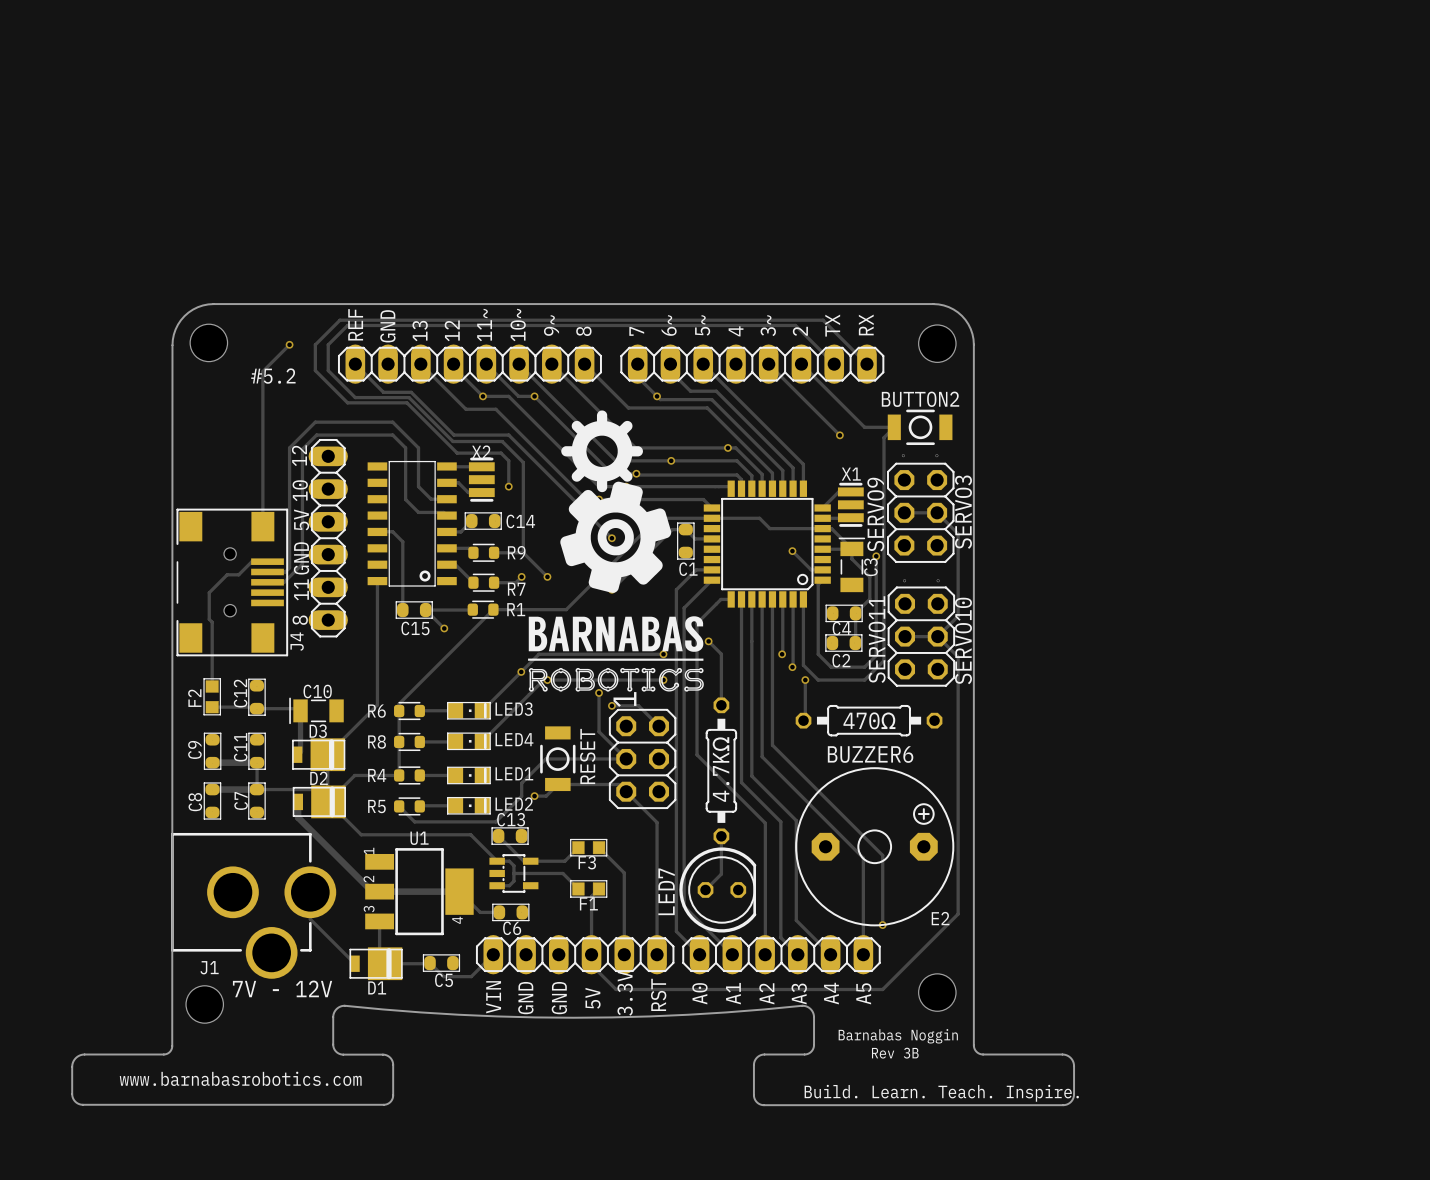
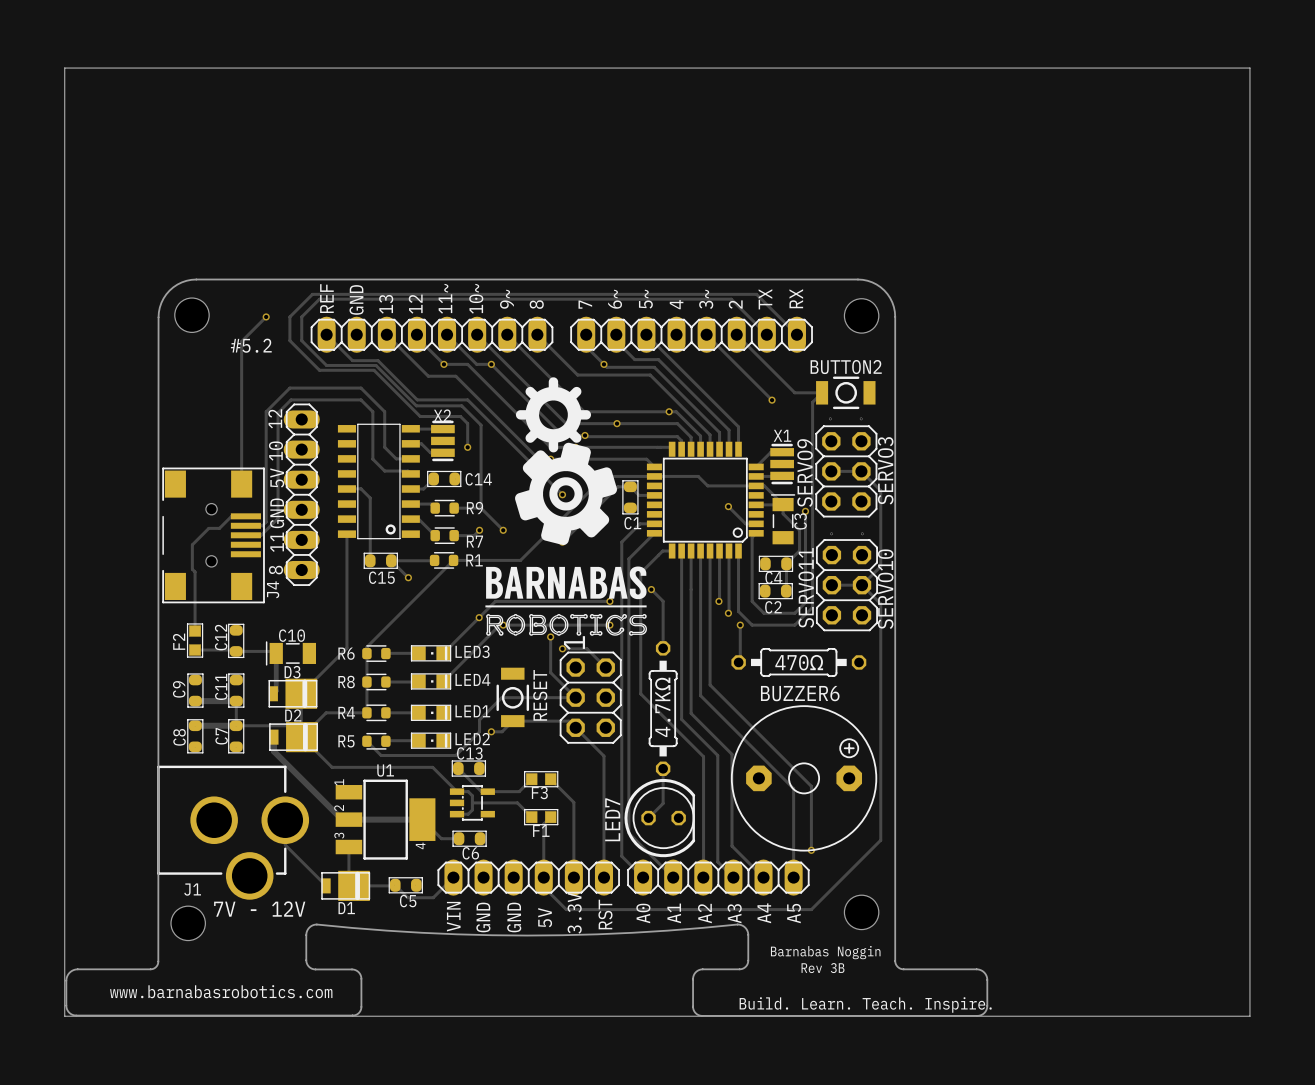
board edge: none -> (64, 68) (1249, 68) (1249, 1016) (64, 1016) (64, 68)
E2 name: E2 (940, 918) -> none

